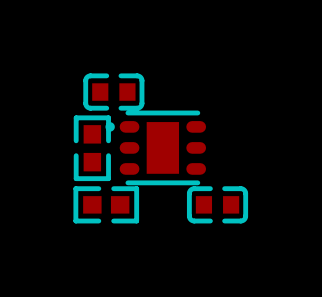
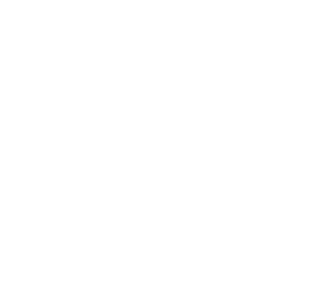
part: (113, 92) -> none
part: (155, 147) -> none
part: (92, 148) -> none
part: (106, 204) -> none
part: (217, 204) -> none

